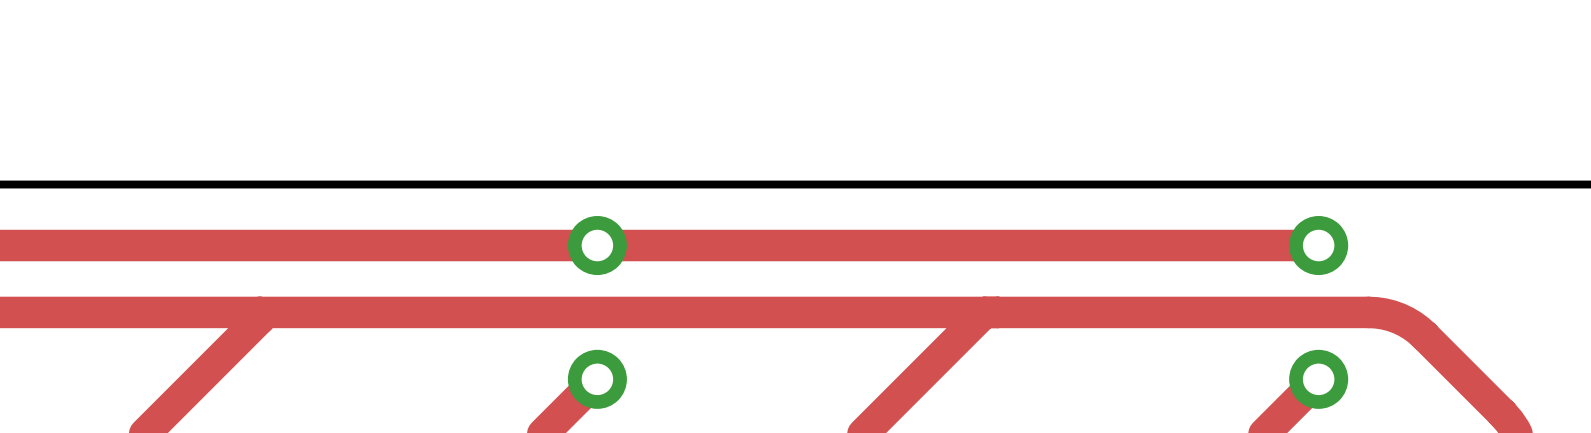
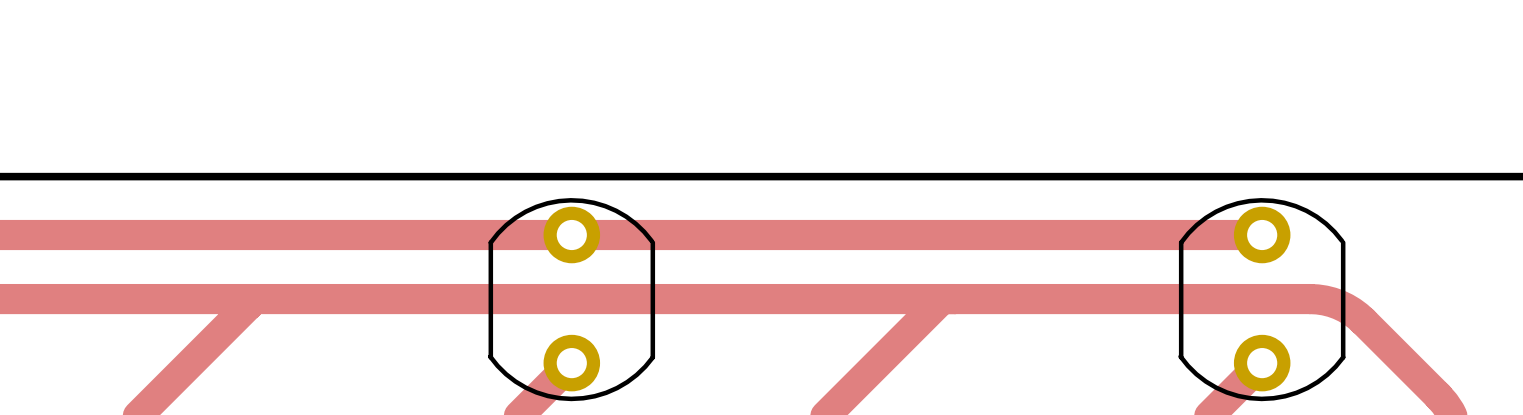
part side: bottom (597, 312) -> top (571, 299)
part side: bottom (1318, 312) -> top (1261, 299)

